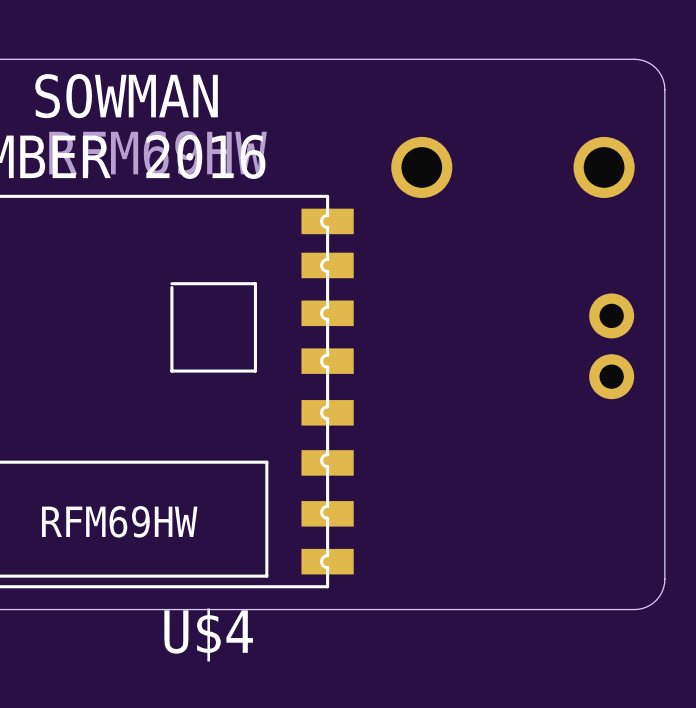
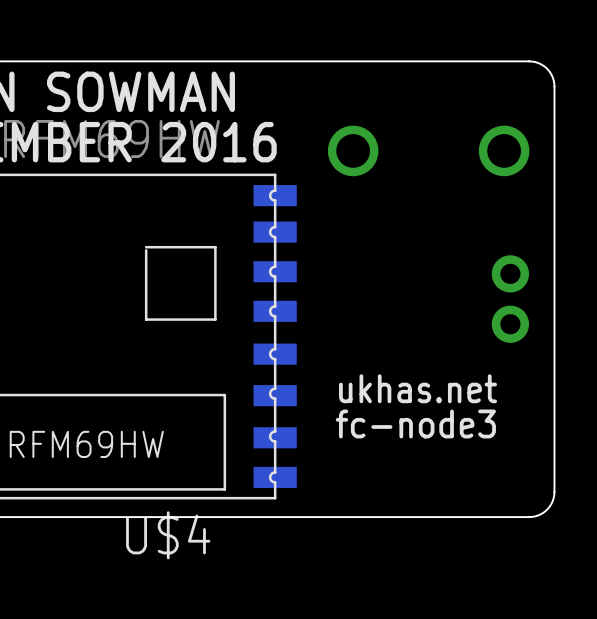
text: none -> ukhas.net (418, 388)
text: none -> fc-node3 (415, 423)

